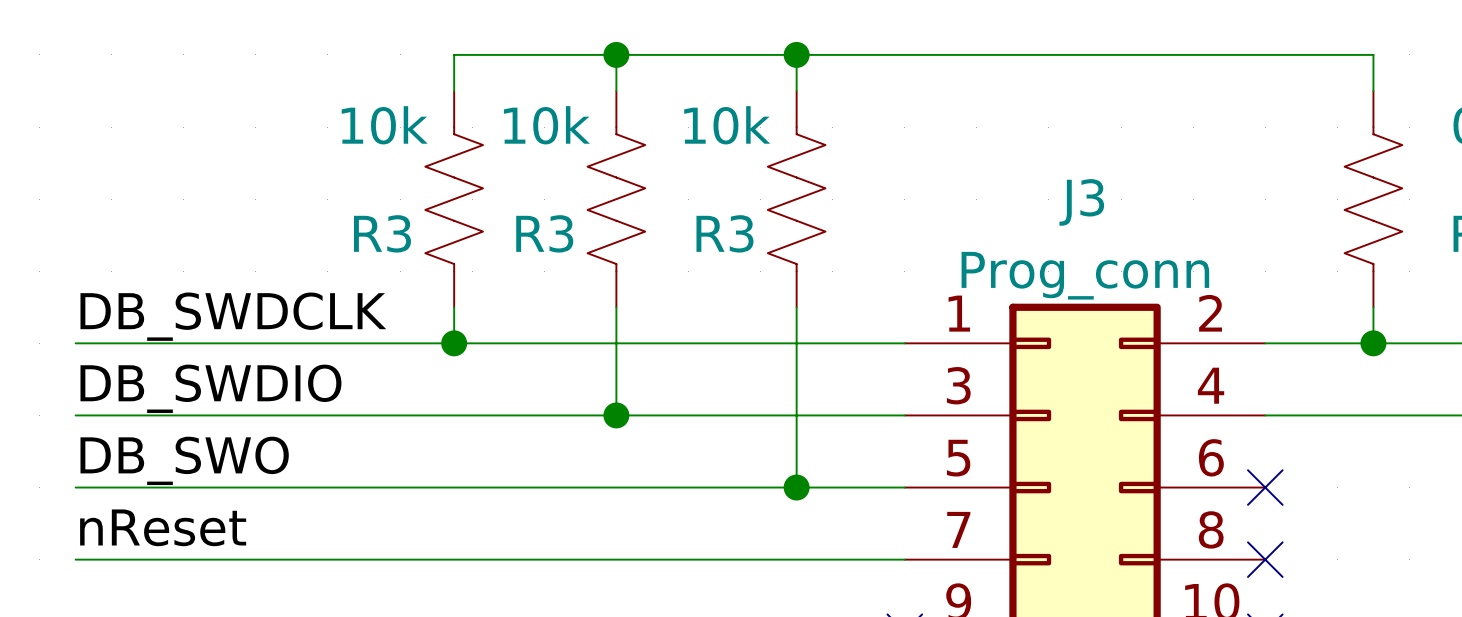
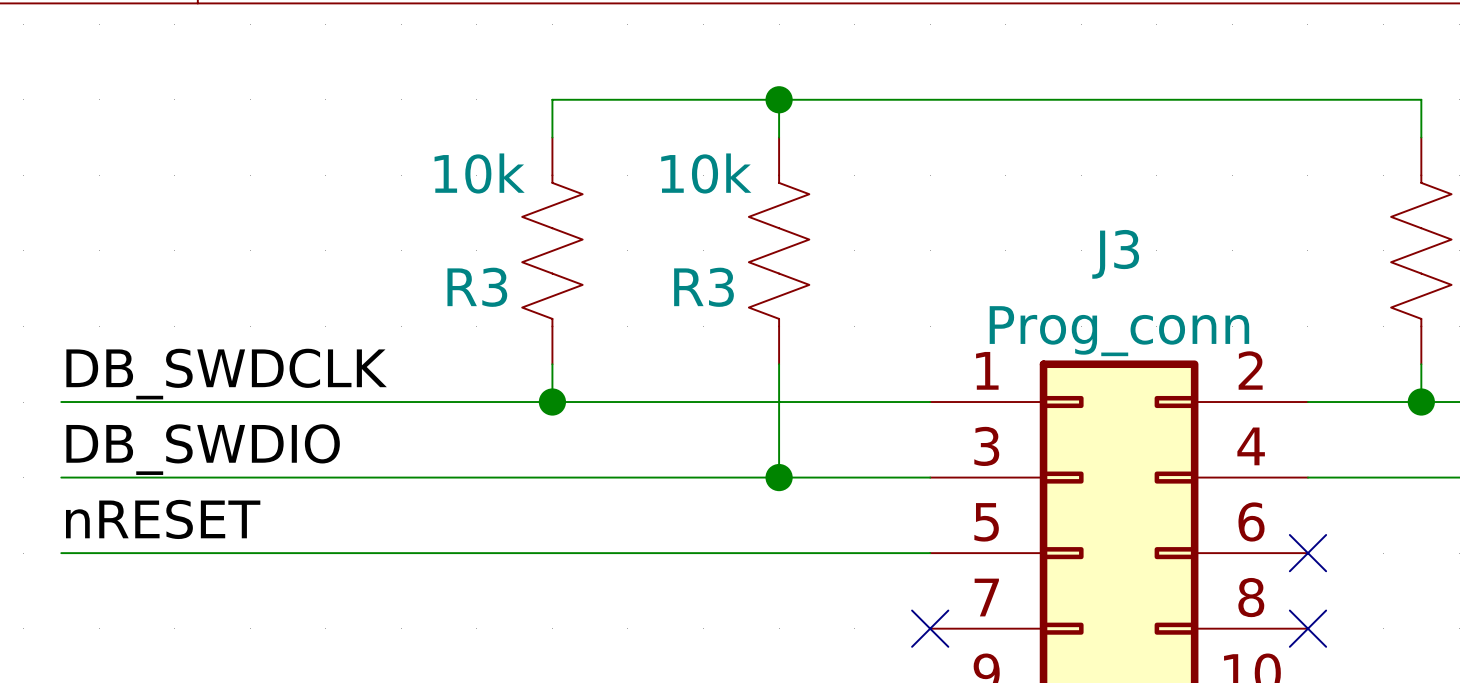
wire: (544, 54) (454, 54) (454, 90) -> (552, 99) (552, 137)
wire: (616, 54) (616, 90) -> (779, 99) (779, 137)
junction: (616, 54) -> none
wire: (796, 54) (796, 90) -> none
junction position: (796, 54) -> (779, 99)
R3: 10k (454, 199) -> none
R3: none -> 10k (552, 250)
R3: 10k (616, 199) -> none
R3 position: (796, 199) -> (779, 250)
wire: (454, 307) (454, 343) -> (552, 364) (552, 402)
wire: (616, 307) (616, 415) -> (779, 364) (779, 477)
wire: (796, 307) (796, 487) -> none
junction: (454, 343) -> none
junction: none -> (552, 402)
junction: (616, 415) -> none
junction: none -> (779, 477)
label: DB_SWO (184, 460) -> nRESET (163, 519)
junction: (796, 487) -> none
label: nReset (163, 527) -> none
wire: (75, 559) (904, 559) -> none
no-connect mark: none -> (930, 628)

